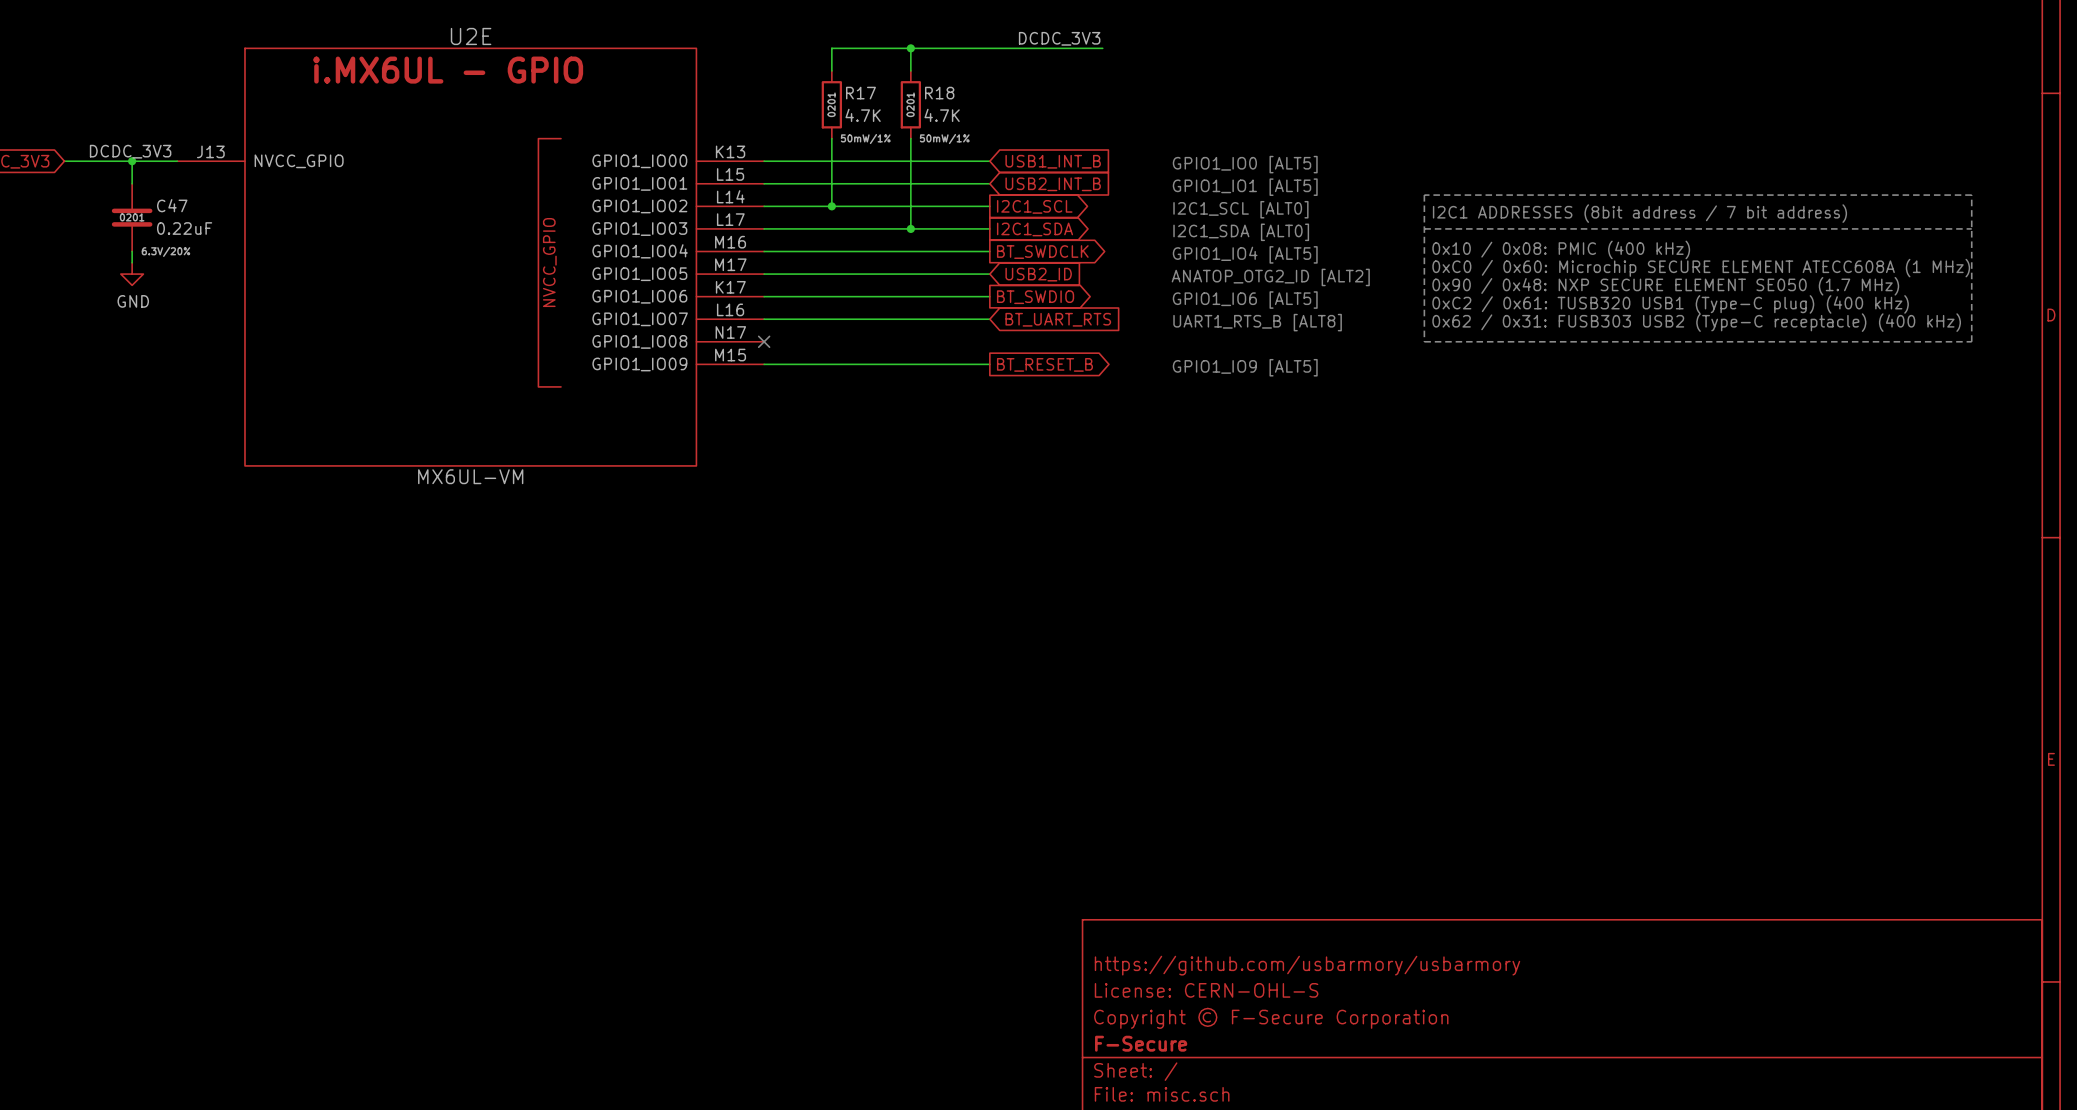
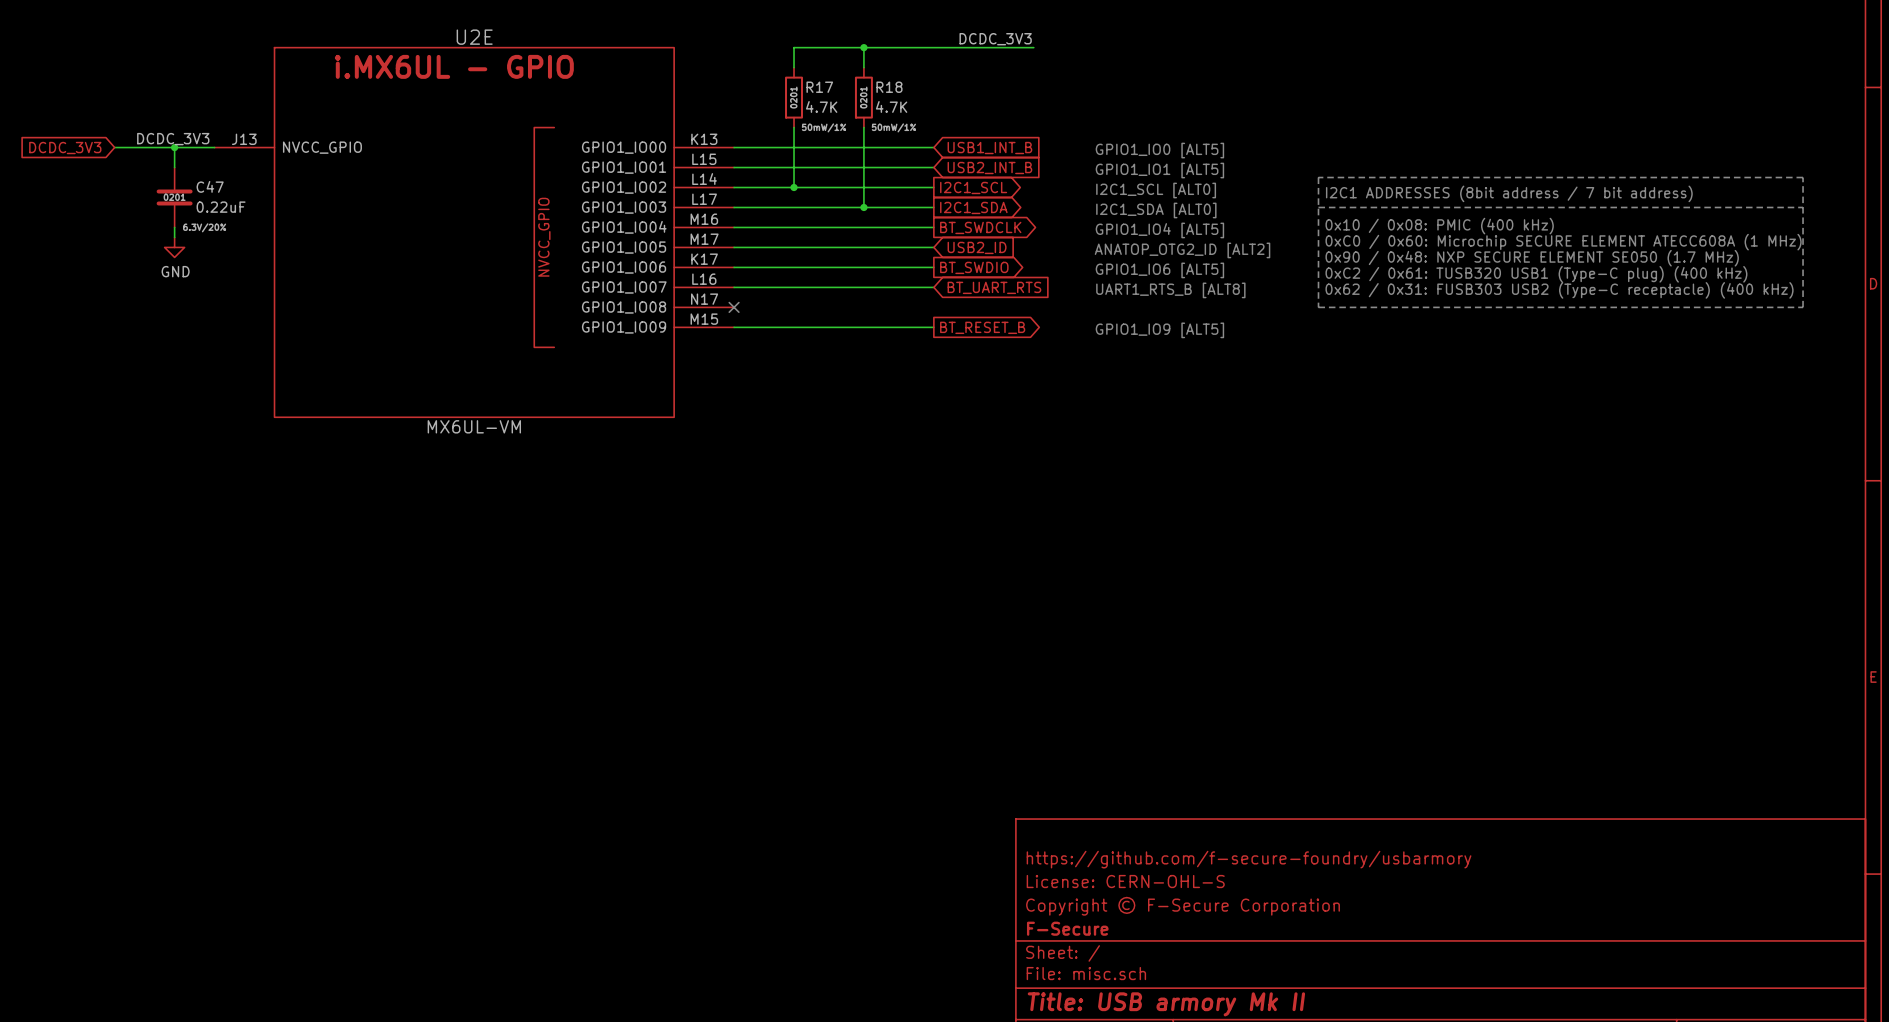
title block: https://github.com/usbarmory/usbarmory (1307, 965) -> https://github.com/f-secure-foundry/usbarmory (1249, 859)

